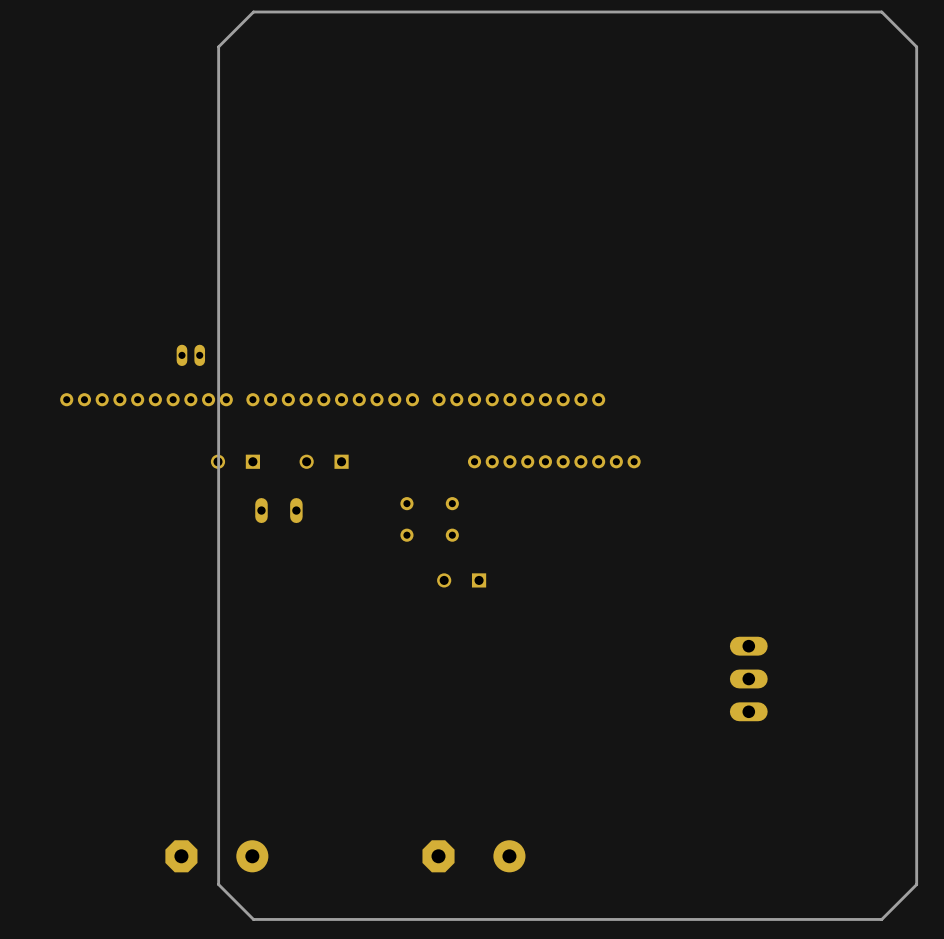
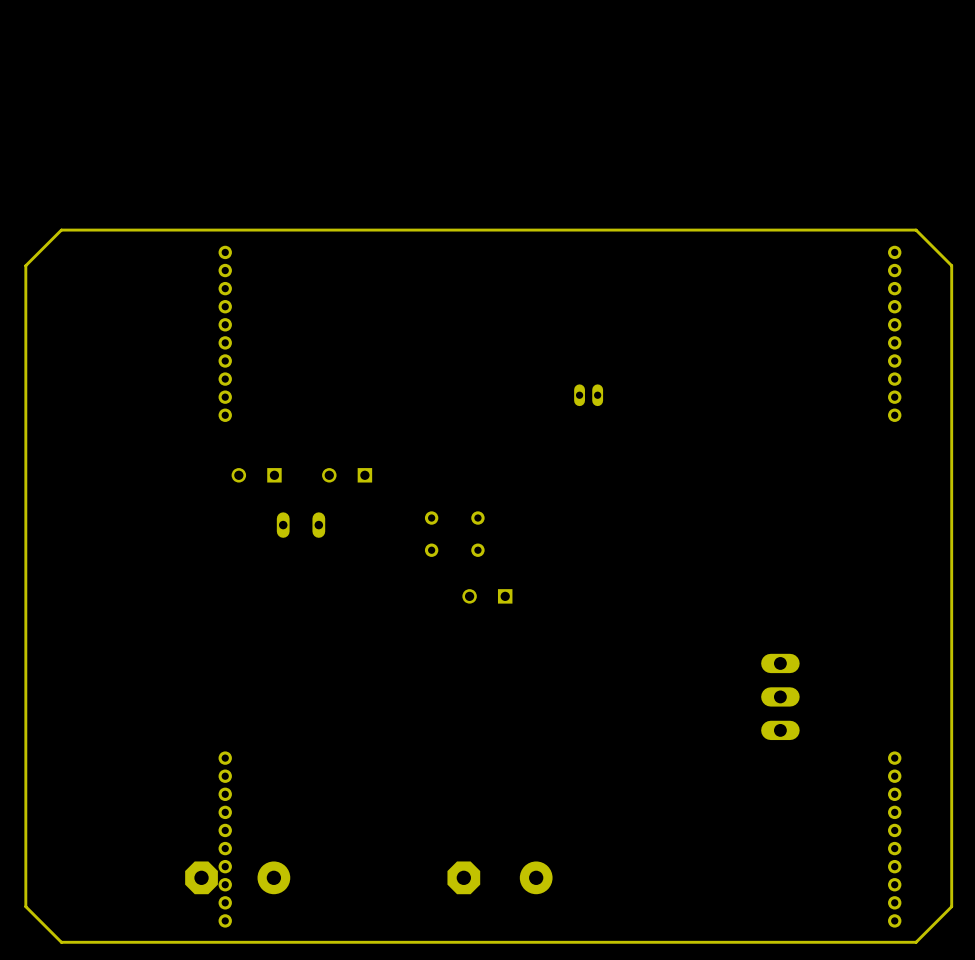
board edge: (916, 256) (916, 46) (881, 12) (253, 12) (218, 46) (218, 884) (253, 919) -> (951, 265) (916, 230) (61, 230) (25, 265) (25, 906) (61, 942) (275, 942)
part: none -> (225, 333)
part: none -> (894, 333)
part: (190, 355) -> none
part: none -> (588, 395)
part: (146, 399) -> none
part: (332, 399) -> none
part: (518, 399) -> none
part: (554, 461) -> none
part: none -> (225, 839)
part: none -> (894, 839)

